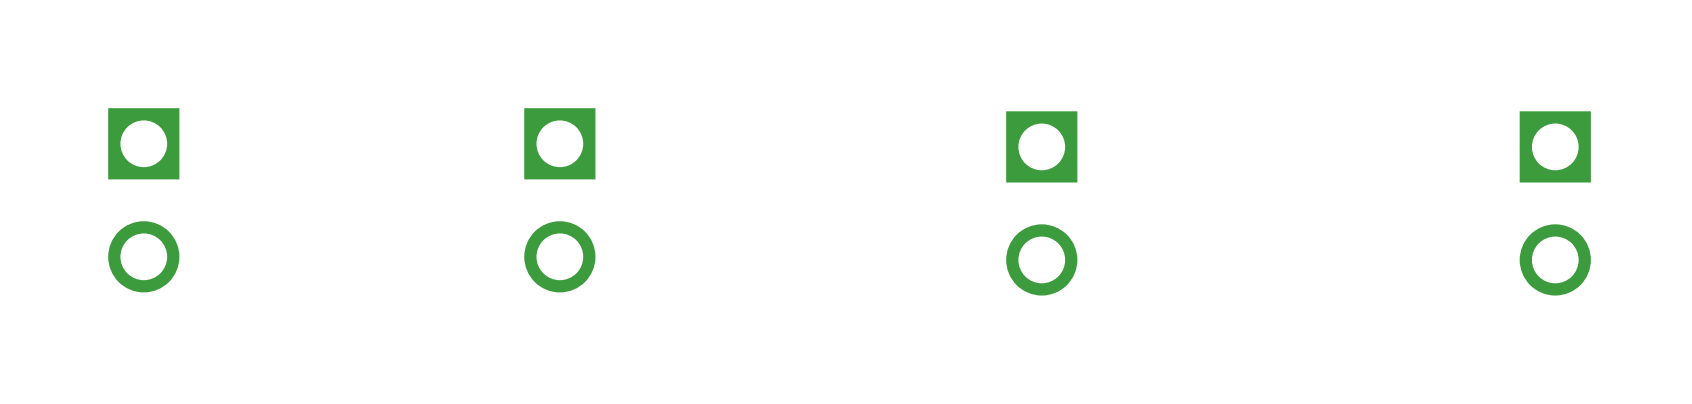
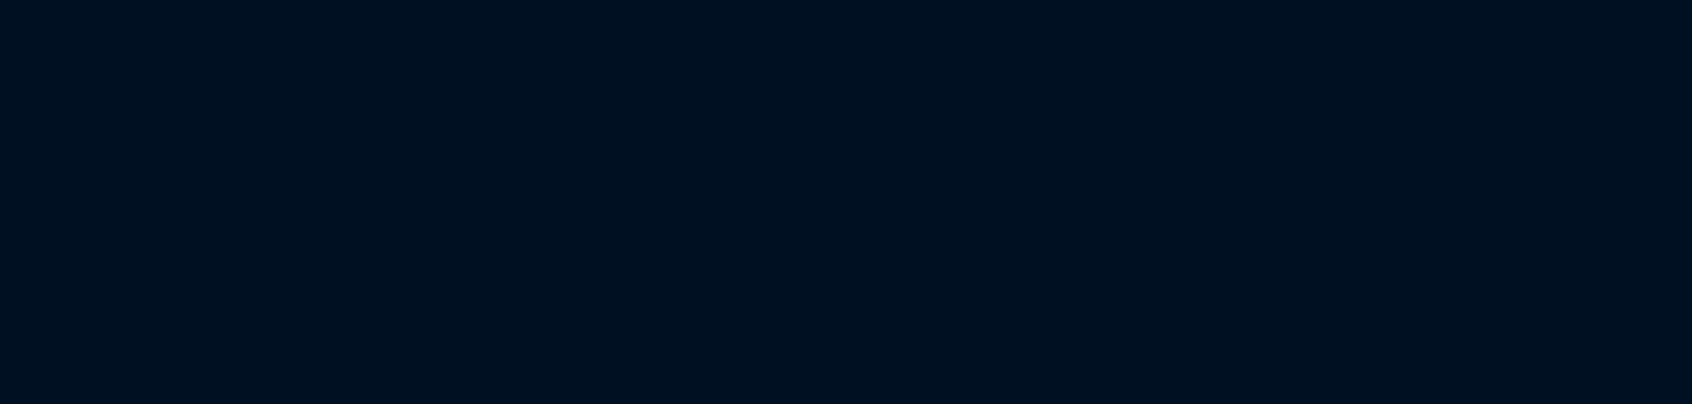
part: (143, 200) -> none
part: (559, 200) -> none
part: (1041, 203) -> none
part: (1555, 203) -> none

